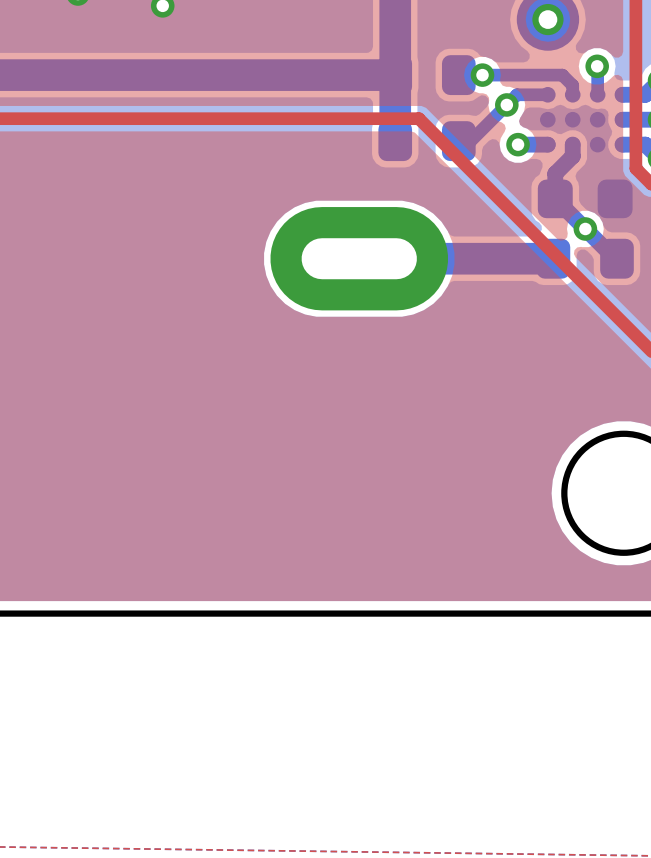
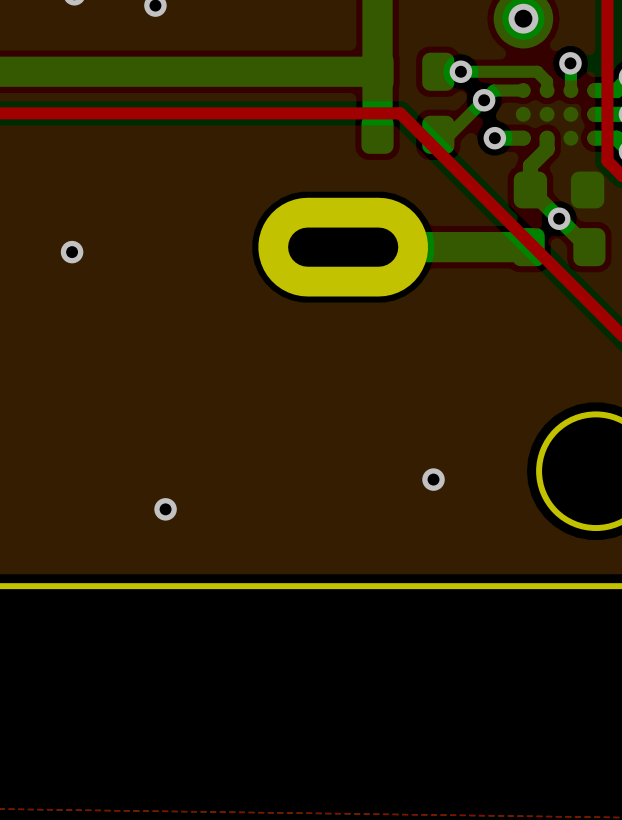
via: none -> (72, 252)
via: none -> (433, 479)
via: none -> (165, 509)

